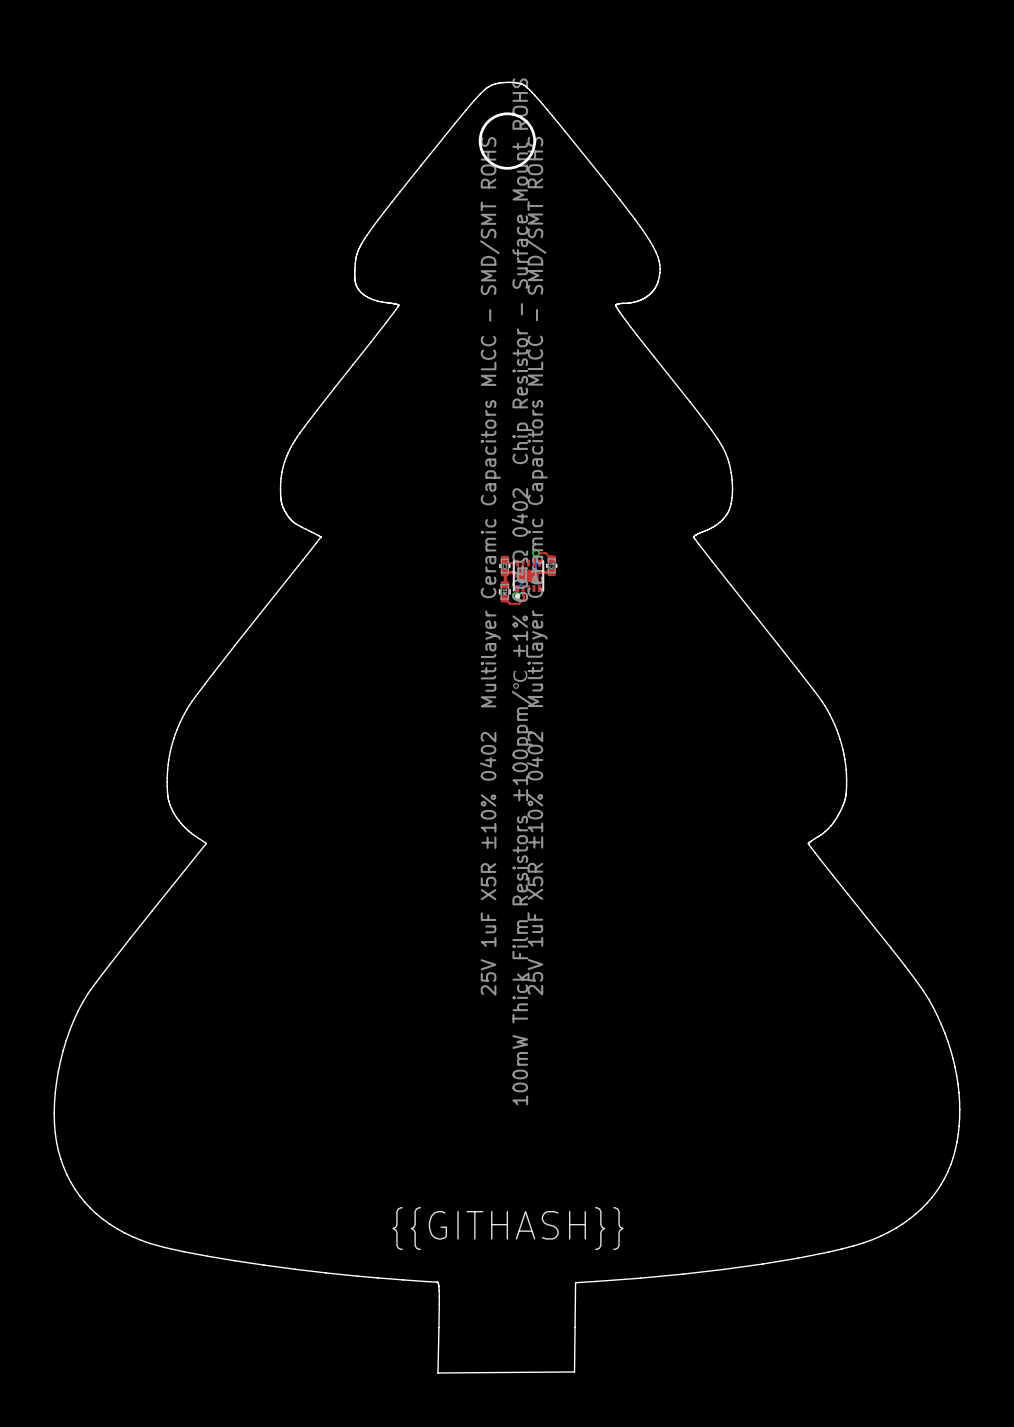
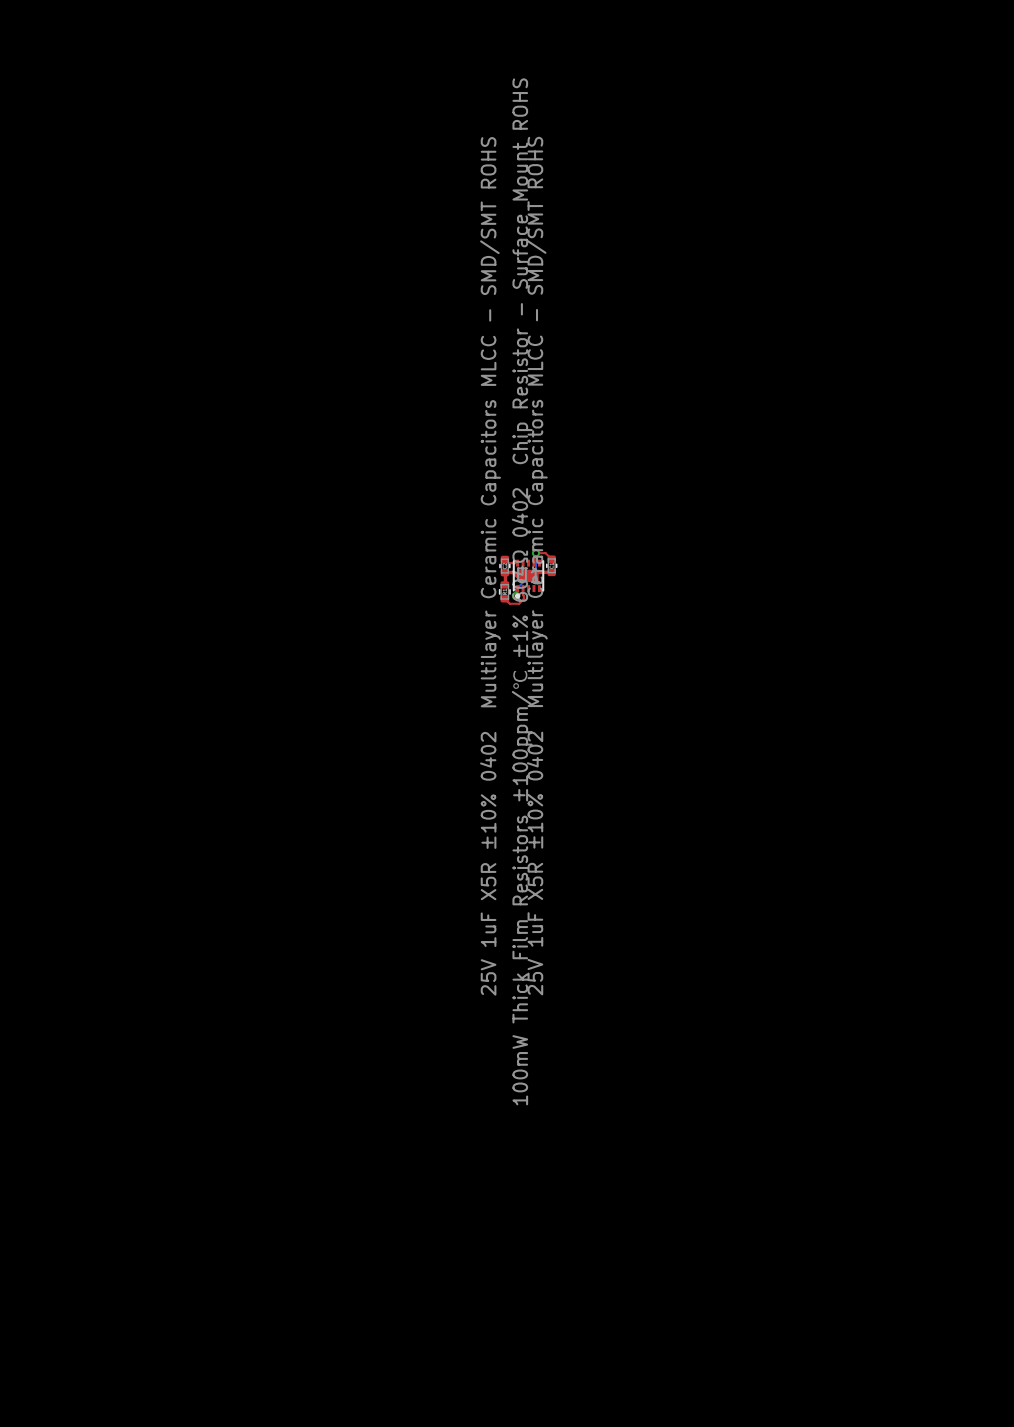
round board edge: [478, 112, 537, 170] -> none
board edge: (398, 304) (371, 298) (358, 288) (355, 280) (354, 269) (359, 246) (384, 211) (474, 100) (488, 86) (507, 82) (523, 84) (538, 99) (620, 199) (645, 234) (655, 251) (659, 272) (653, 290) (640, 300) (615, 304) -> none
board edge: (398, 305) (300, 432) (284, 462) (280, 488) (283, 508) (294, 522) (320, 536) -> none
board edge: (615, 305) (711, 430) (727, 458) (732, 483) (729, 508) (718, 523) (693, 536) -> none
board edge: (320, 537) (204, 684) (182, 717) (169, 755) (167, 777) (168, 799) (172, 811) (180, 822) (206, 843) (87, 994) (73, 1020) (63, 1050) (56, 1082) (54, 1113) (56, 1142) (60, 1159) (66, 1174) (79, 1195) (96, 1213) (116, 1228) (150, 1243) (207, 1256) (326, 1272) (437, 1282) (439, 1296) (438, 1372) (574, 1371) (575, 1282) (683, 1274) (762, 1264) (841, 1249) (864, 1242) (888, 1232) (909, 1219) (926, 1203) (940, 1185) (950, 1164) (956, 1142) (959, 1117) (958, 1092) (955, 1067) (941, 1024) (923, 990) (808, 843) -> none
board edge: (693, 537) (814, 690) (827, 710) (836, 729) (845, 764) (845, 799) (831, 825) (808, 843) -> none
text: {{GITHASH}} (507, 1228) -> none

